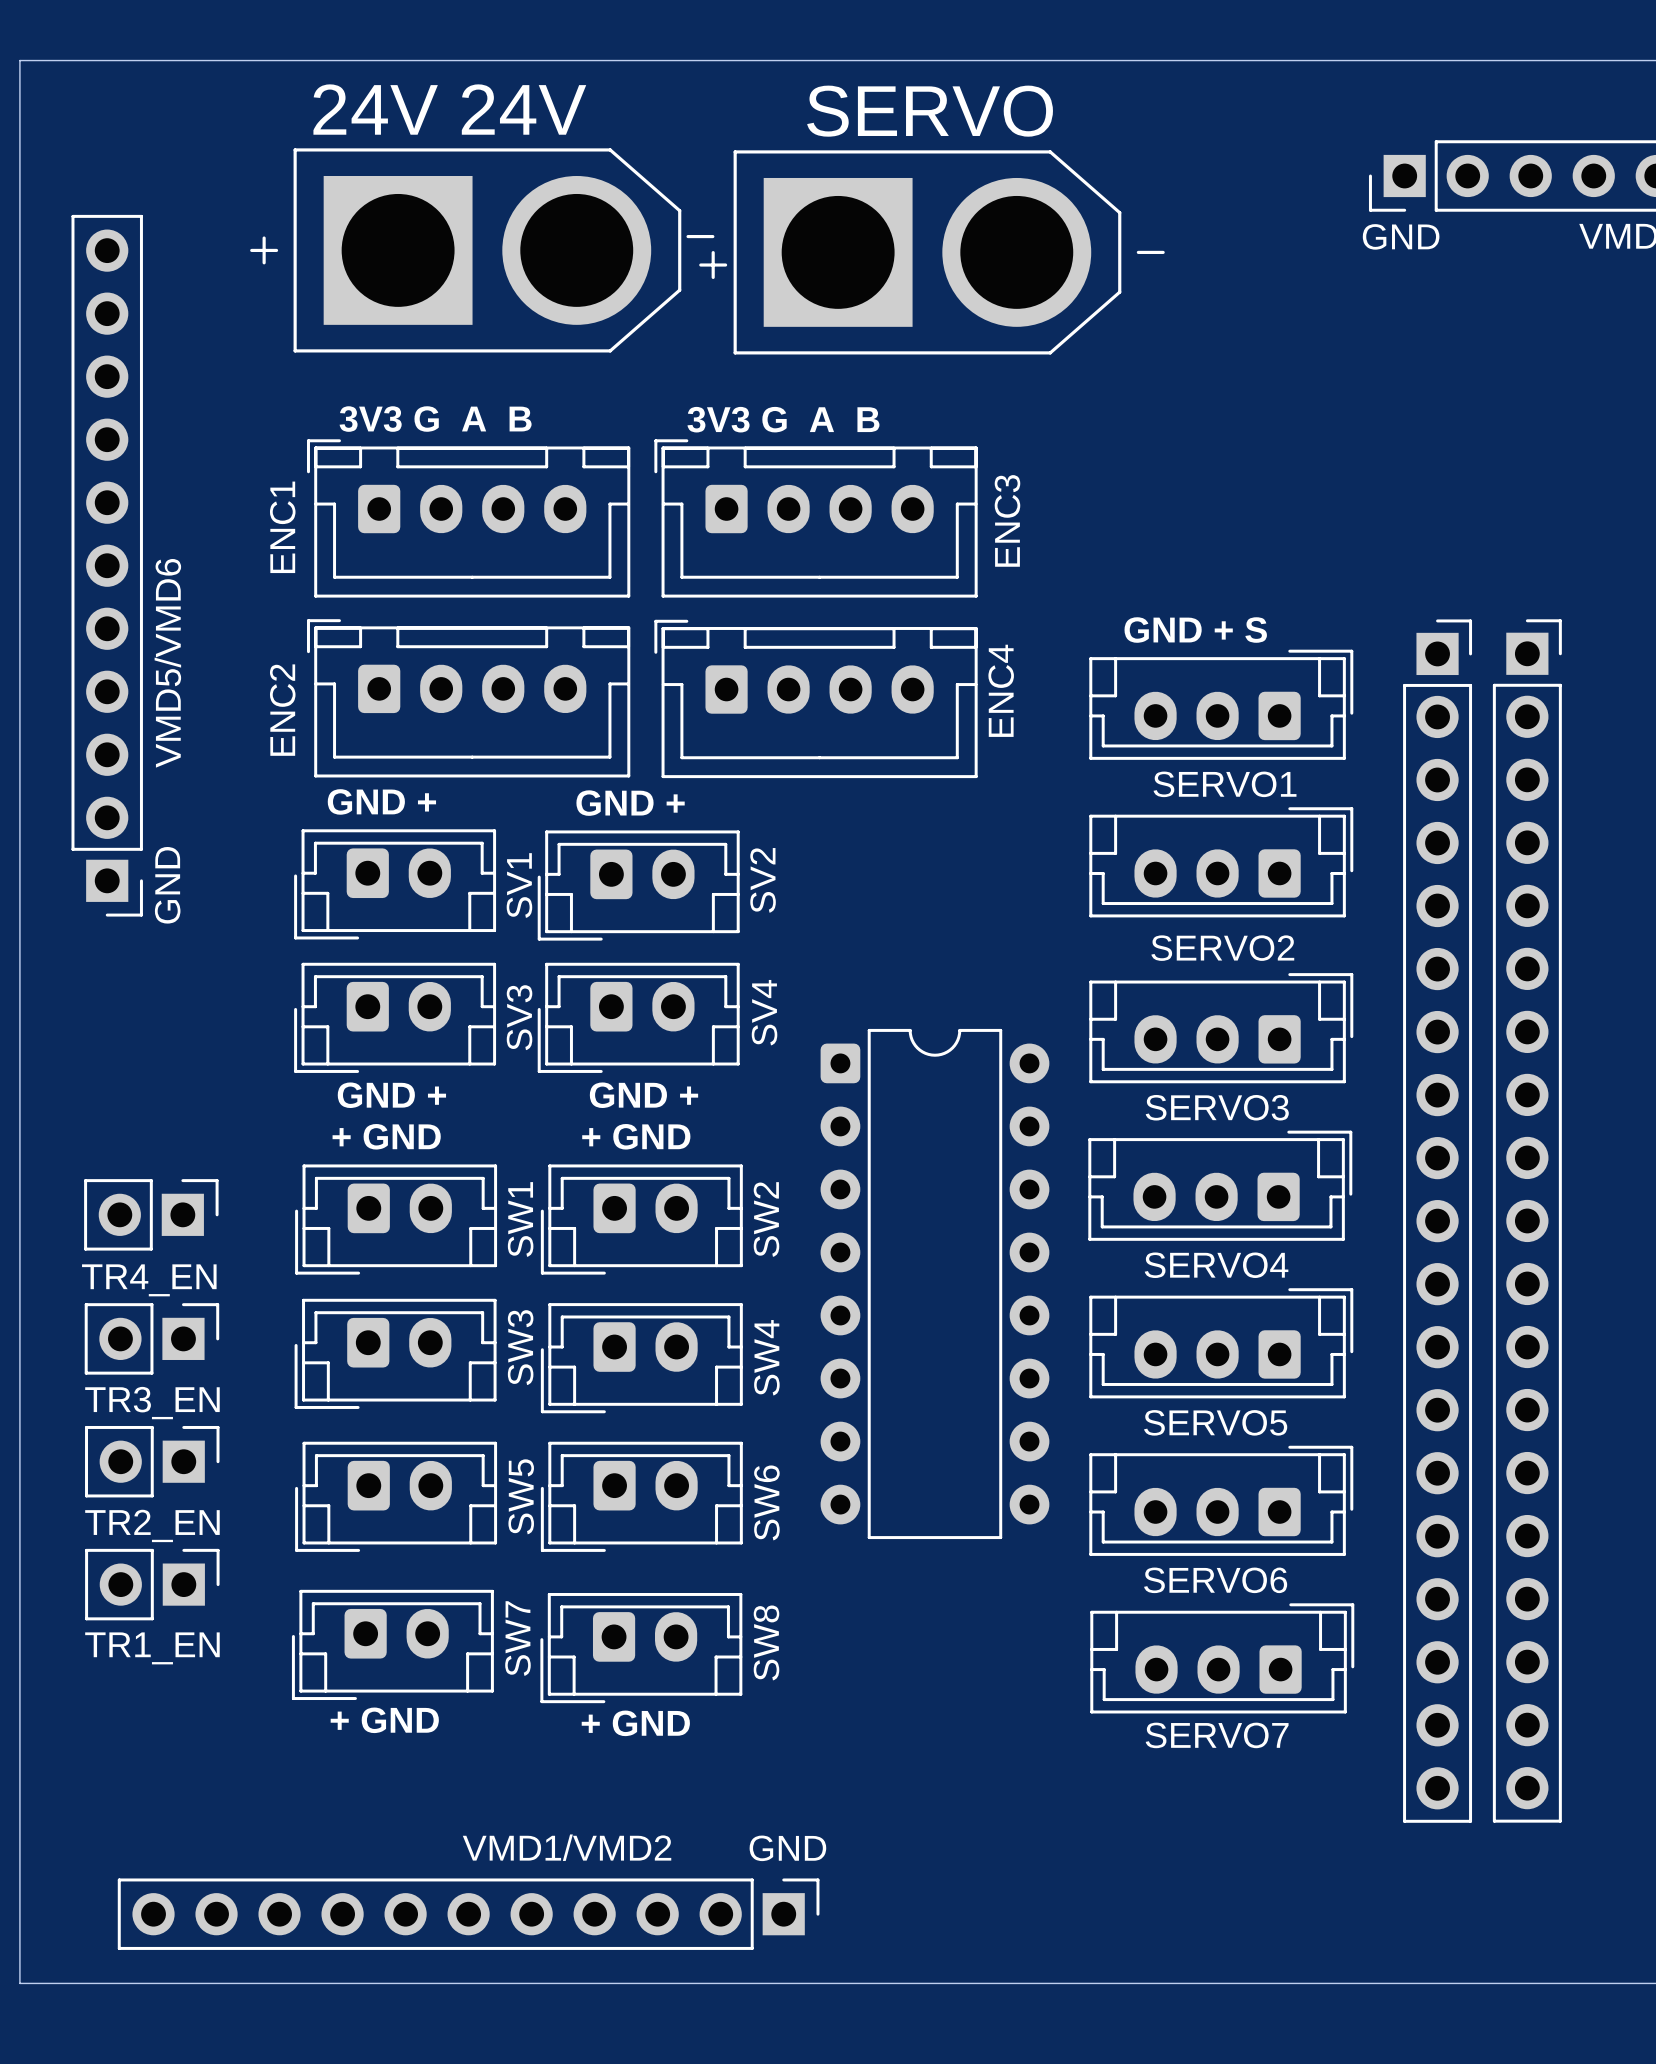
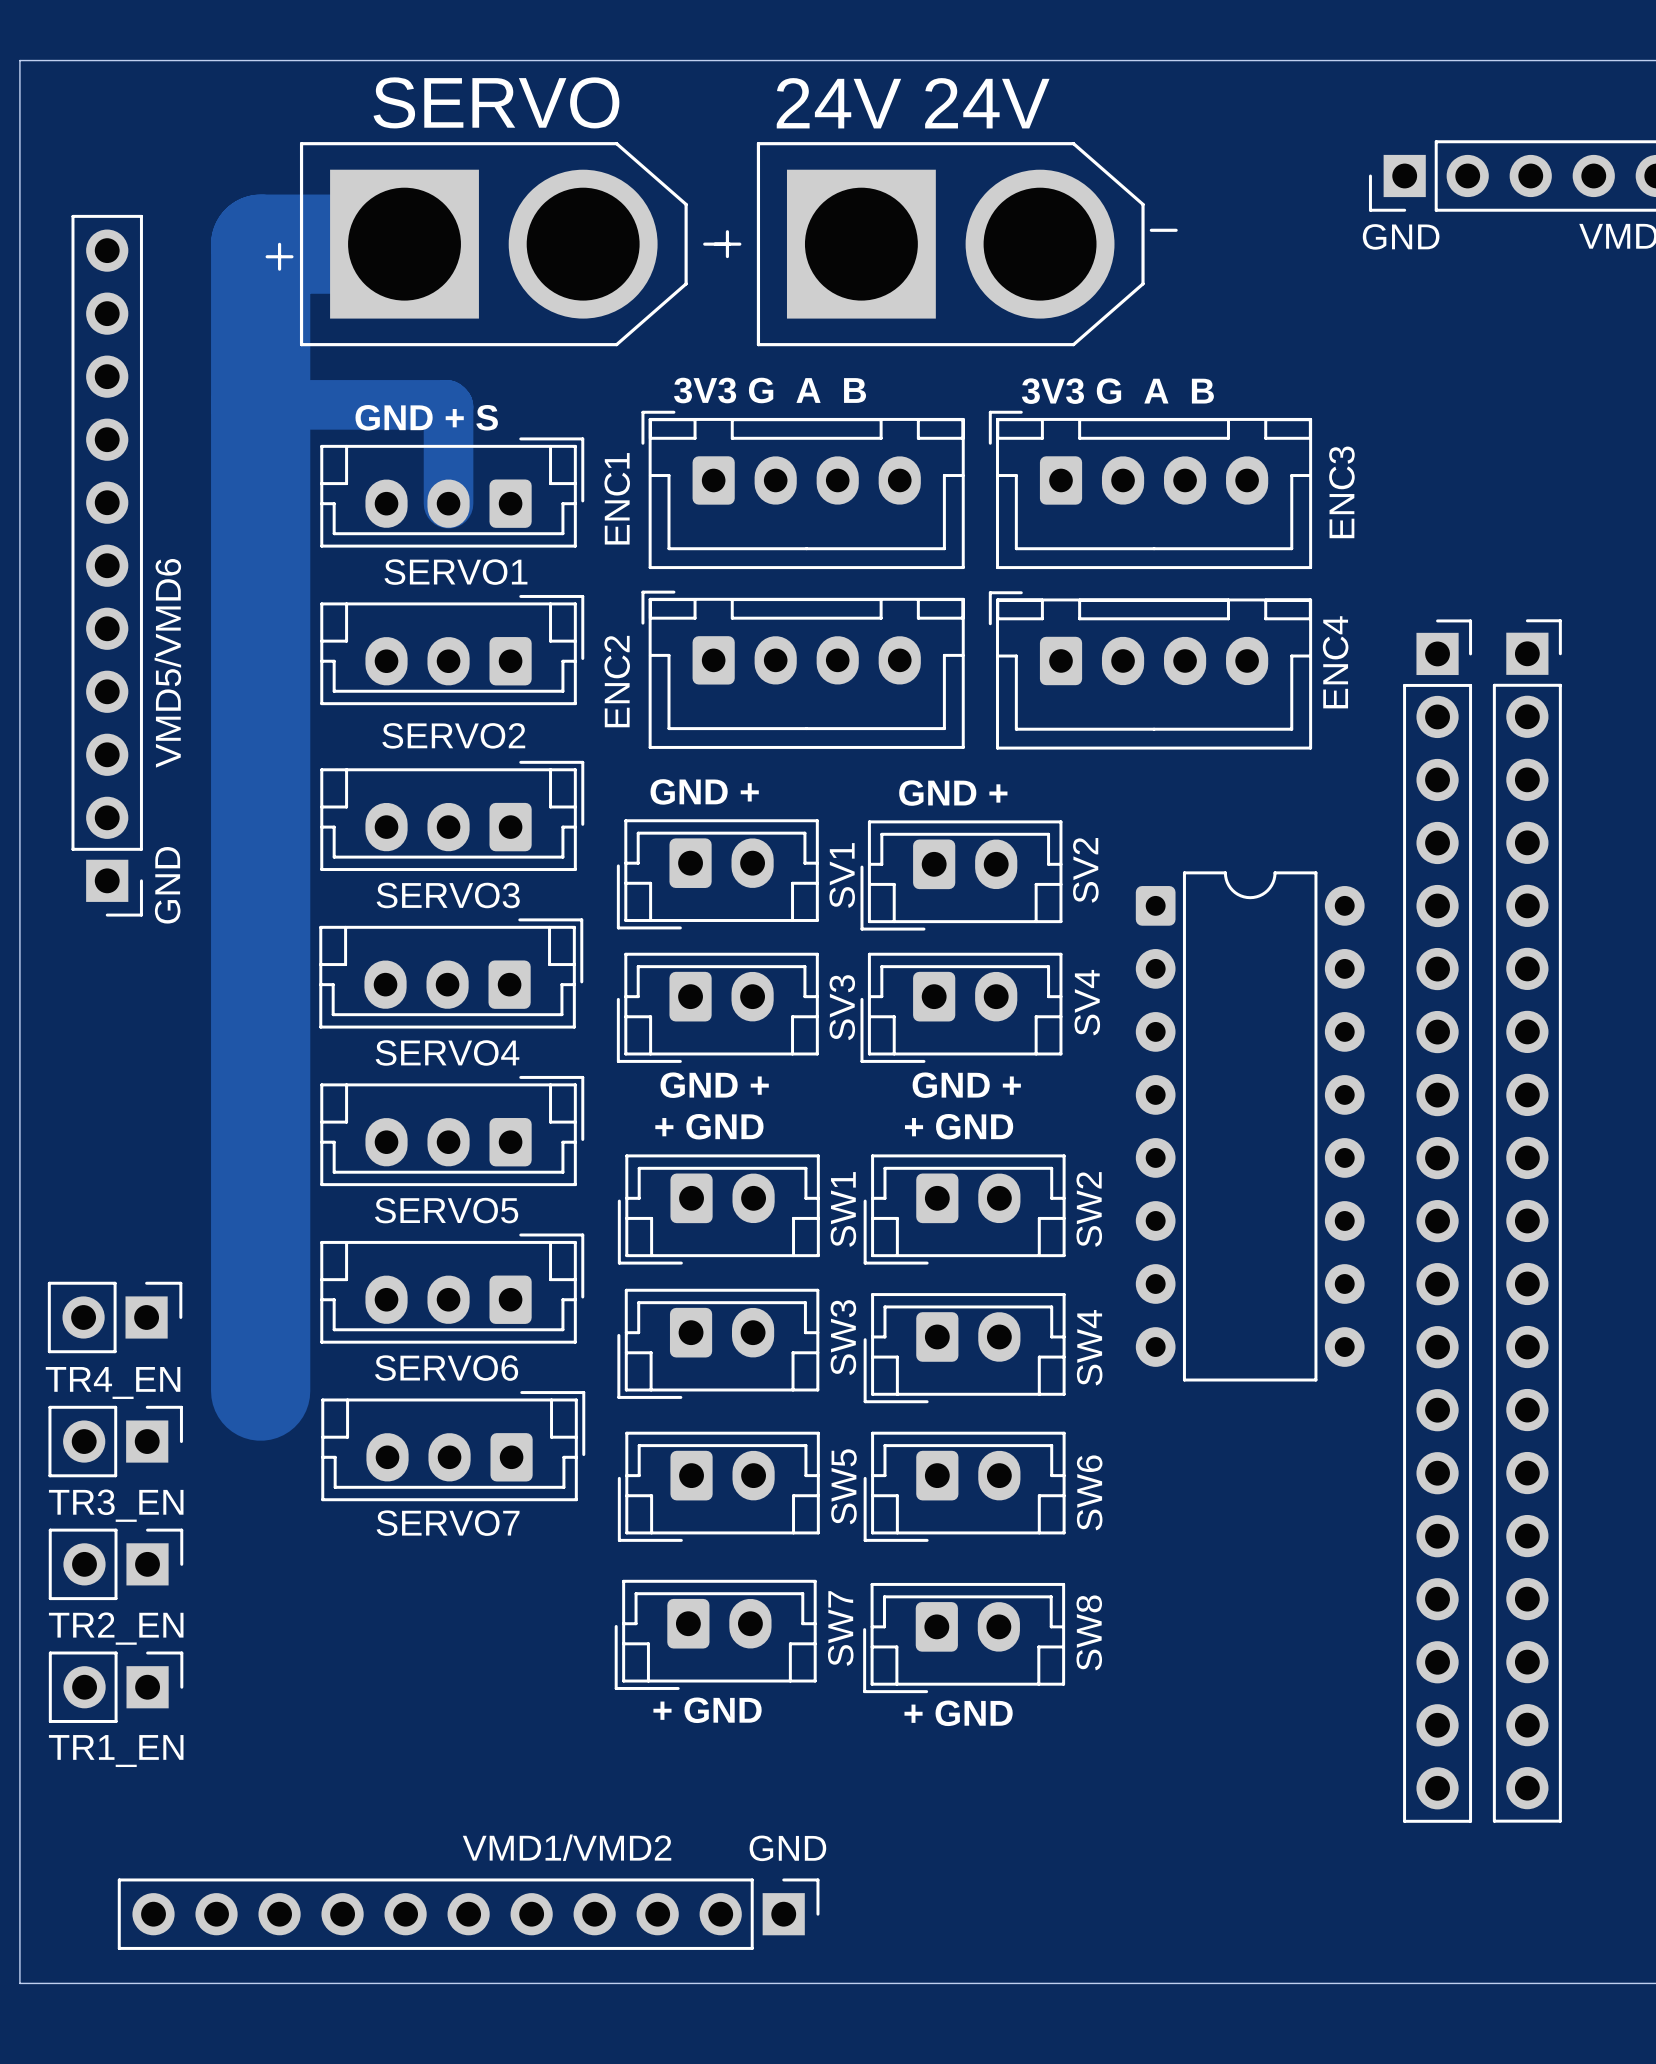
text position: 24V 24V (449, 109) -> 24V 24V (913, 103)
text position: SERVO (930, 111) -> SERVO (496, 102)
part footprint: [250, 148, 715, 353] -> [265, 142, 732, 347]
part footprint: [699, 150, 1165, 355] -> [713, 142, 1178, 347]
track: none -> (404, 244) (260, 244) (260, 1391)
text: none -> 3V3 G A B (1117, 391)
track: none -> (260, 404) (446, 404) (448, 406) (448, 503)
text: 3V3 G A B (435, 419) -> GND + S (426, 417)
text position: 3V3 G A B (783, 419) -> 3V3 G A B (770, 390)
ENC1 position: (468, 518) -> (803, 489)
ENC3 position: (816, 518) -> (1150, 489)
text: GND + S (1195, 630) -> none
ENC2 position: (468, 698) -> (803, 669)
ENC4 position: (816, 698) -> (1150, 670)
SERVO1 position: (1221, 704) -> (452, 492)
text: none -> GND + (953, 793)
text: GND + (381, 801) -> none
text position: GND + (630, 803) -> GND + (704, 791)
SERVO2 position: (1221, 862) -> (452, 650)
SV1 position: (395, 884) -> (717, 874)
SV2 position: (638, 885) -> (961, 875)
SV3 position: (395, 1017) -> (717, 1007)
SV4 position: (638, 1017) -> (961, 1007)
SERVO3 position: (1221, 1028) -> (452, 815)
text: none -> GND + (966, 1085)
text: GND + (391, 1095) -> none
text position: GND + (643, 1095) -> GND + (714, 1085)
text: none -> + GND (959, 1126)
text: + GND (386, 1136) -> none
text position: + GND (636, 1136) -> + GND (709, 1126)
SERVO4 position: (1220, 1185) -> (451, 973)
TR4_EN position: (151, 1214) -> (115, 1317)
SW1 position: (396, 1219) -> (718, 1209)
SW2 position: (641, 1219) -> (964, 1209)
part position: (934, 1283) -> (1250, 1126)
TR3_EN position: (151, 1338) -> (115, 1441)
SERVO5 position: (1221, 1343) -> (452, 1131)
SW3 position: (395, 1353) -> (718, 1343)
SW4 position: (641, 1358) -> (964, 1348)
TR2_EN position: (152, 1461) -> (116, 1564)
SW5 position: (396, 1496) -> (718, 1486)
SW6 position: (641, 1496) -> (964, 1486)
SERVO6 position: (1221, 1500) -> (452, 1288)
TR1_EN position: (152, 1584) -> (116, 1687)
SW7 position: (392, 1644) -> (715, 1634)
SW8 position: (641, 1648) -> (964, 1638)
SERVO7 position: (1222, 1658) -> (453, 1446)
text: none -> + GND (958, 1713)
text: + GND (384, 1720) -> none
text position: + GND (635, 1723) -> + GND (707, 1710)

